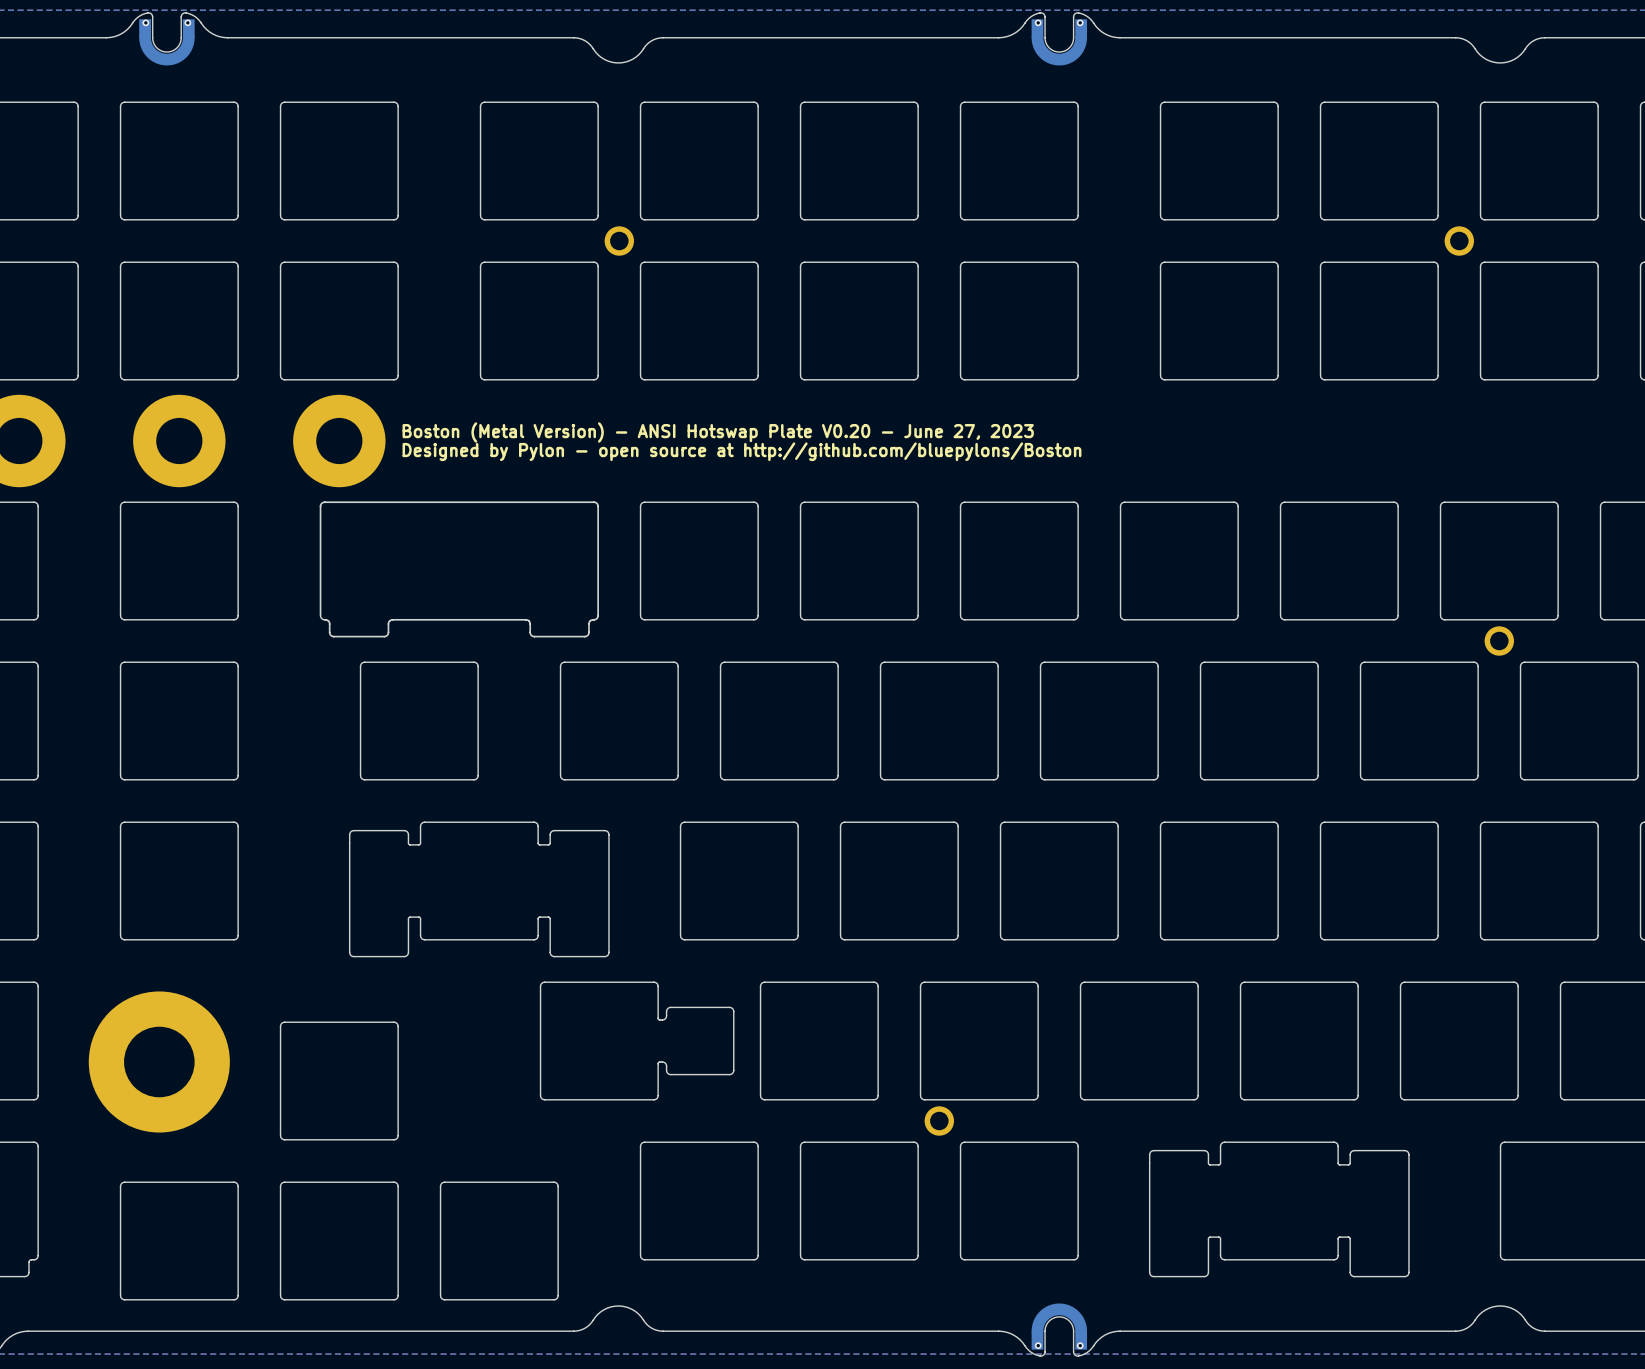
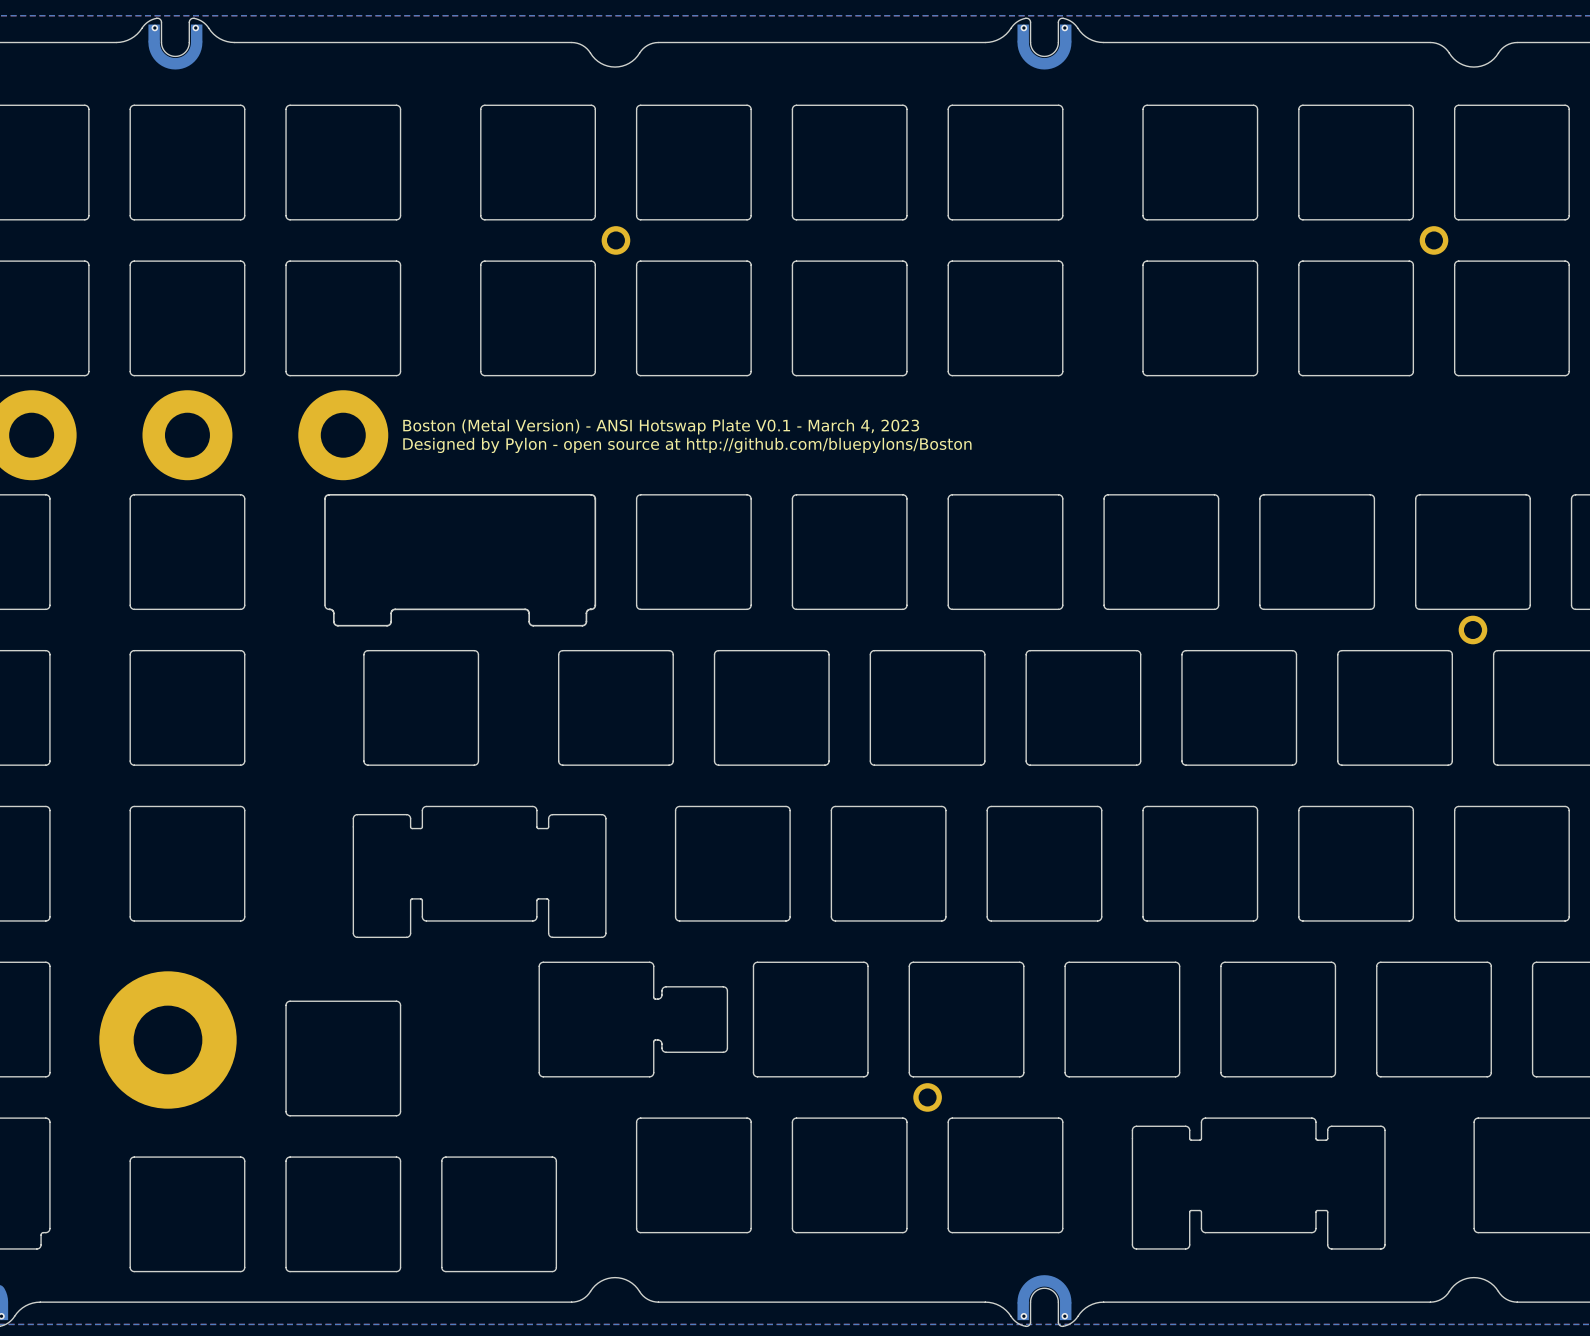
text: Boston (Metal Version) - ANSI Hotswap Plate V0.20 - June 27, 2023 (718, 432) -> Boston (Metal Version) - ANSI Hotswap Plate V0.1 - March 4, 2023 (661, 426)

